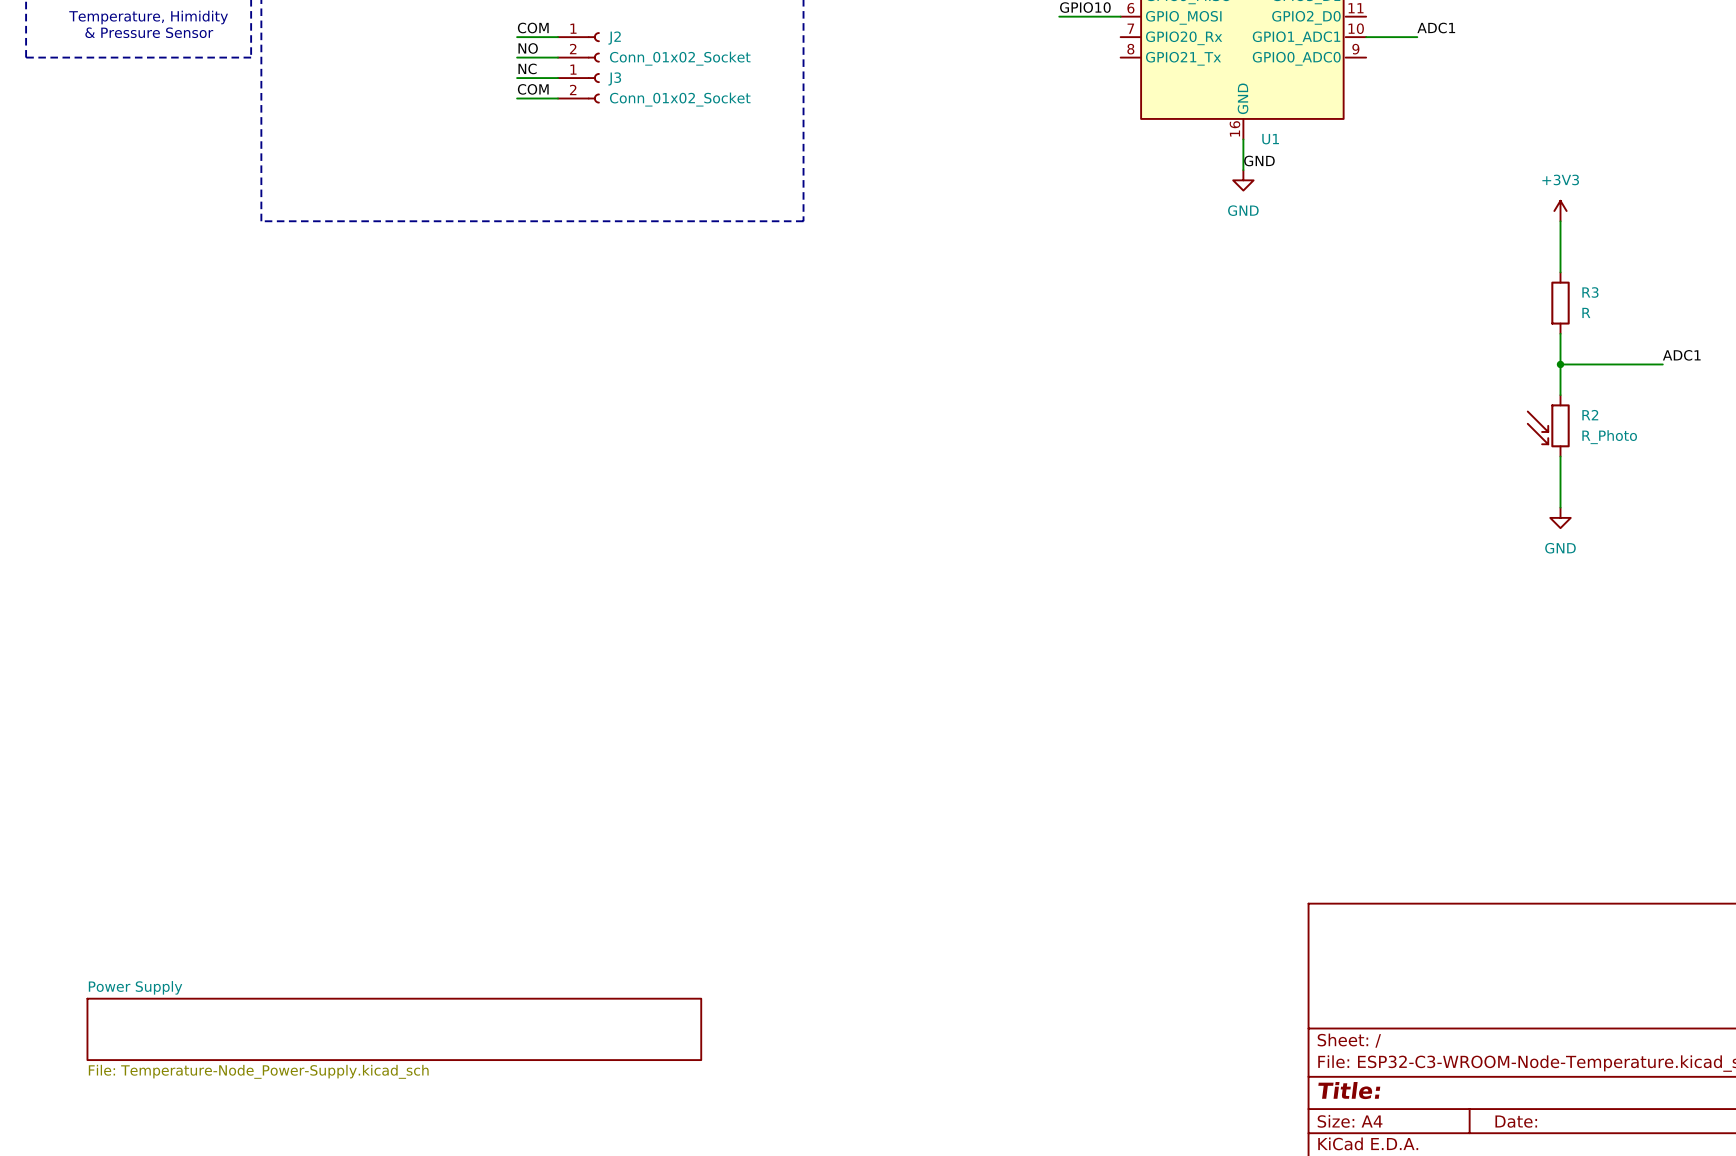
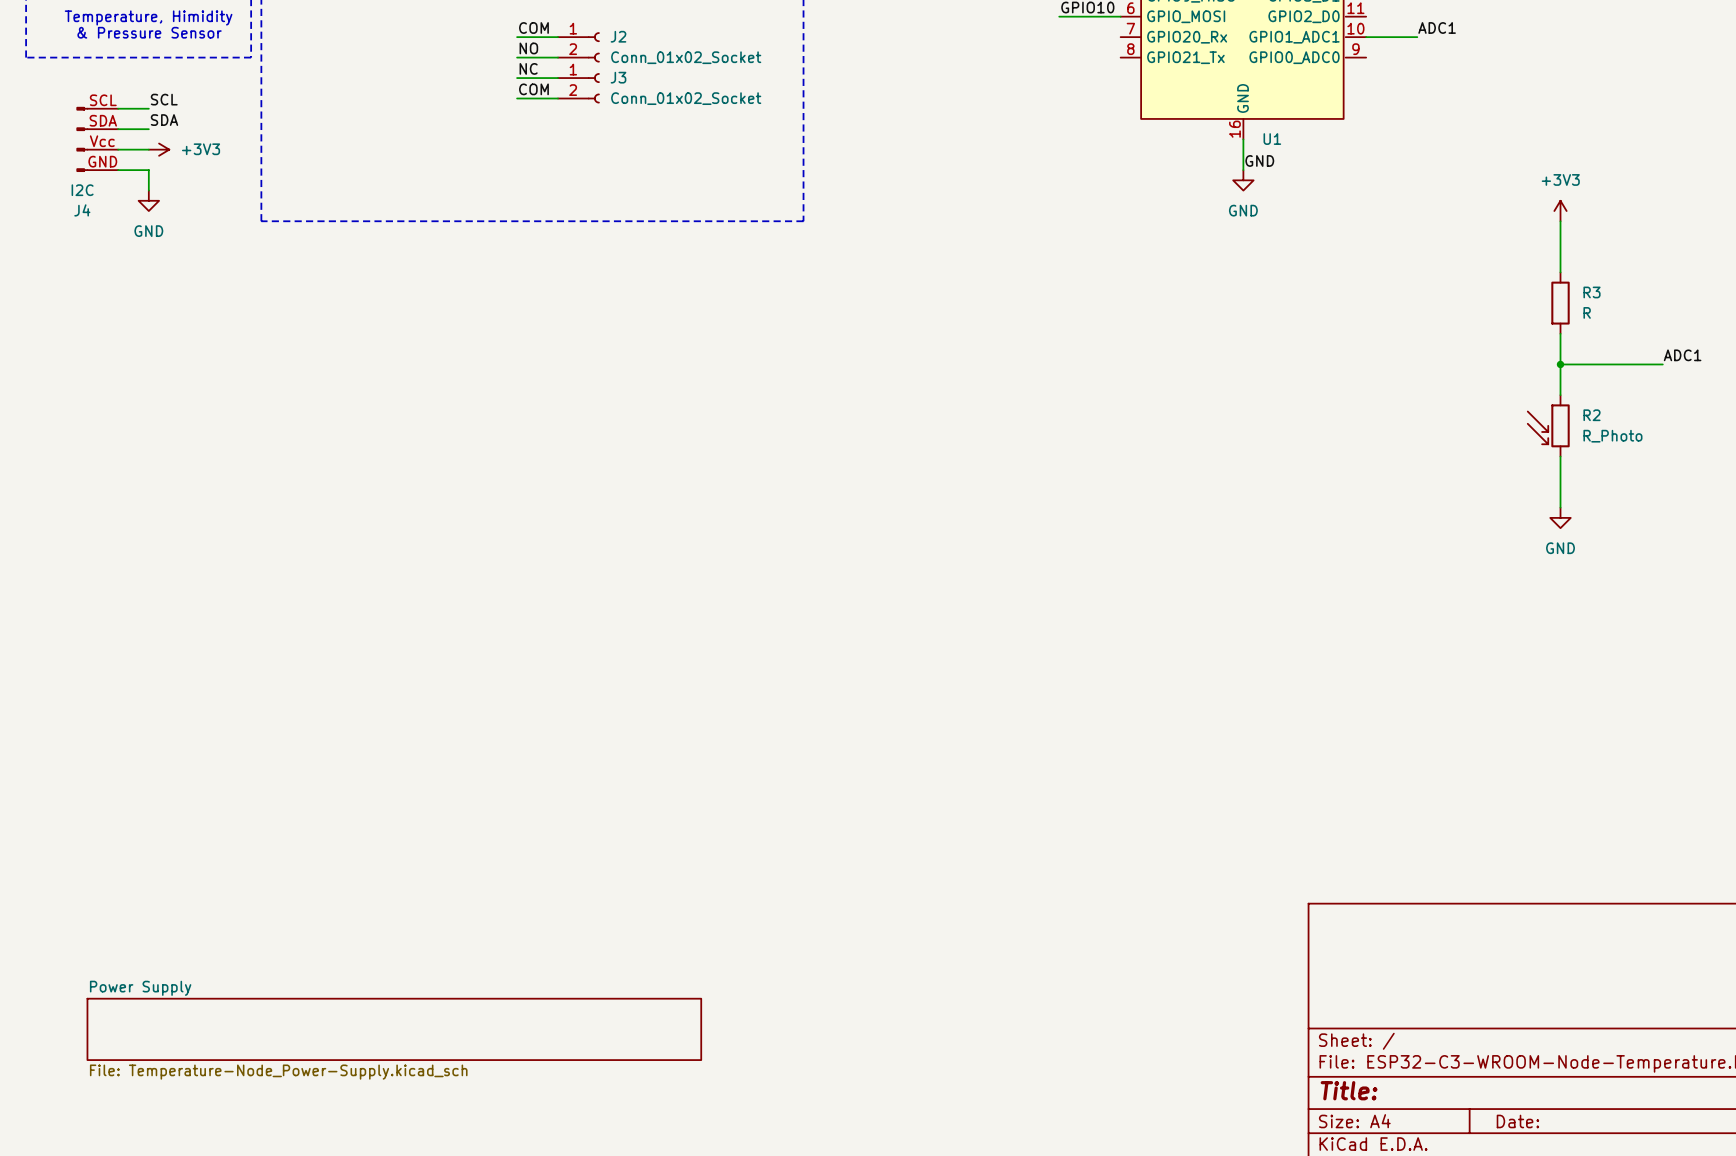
label: none -> SCL (164, 99)
wire: none -> (118, 108) (148, 108)
label: none -> SDA (164, 120)
wire: none -> (118, 129) (148, 129)
J4: none -> I2C (97, 139)
wire: none -> (118, 149) (148, 149)
power symbol: none -> +3V3 (159, 149)
wire: none -> (118, 170) (148, 170) (148, 190)
power symbol: none -> GND (148, 200)

